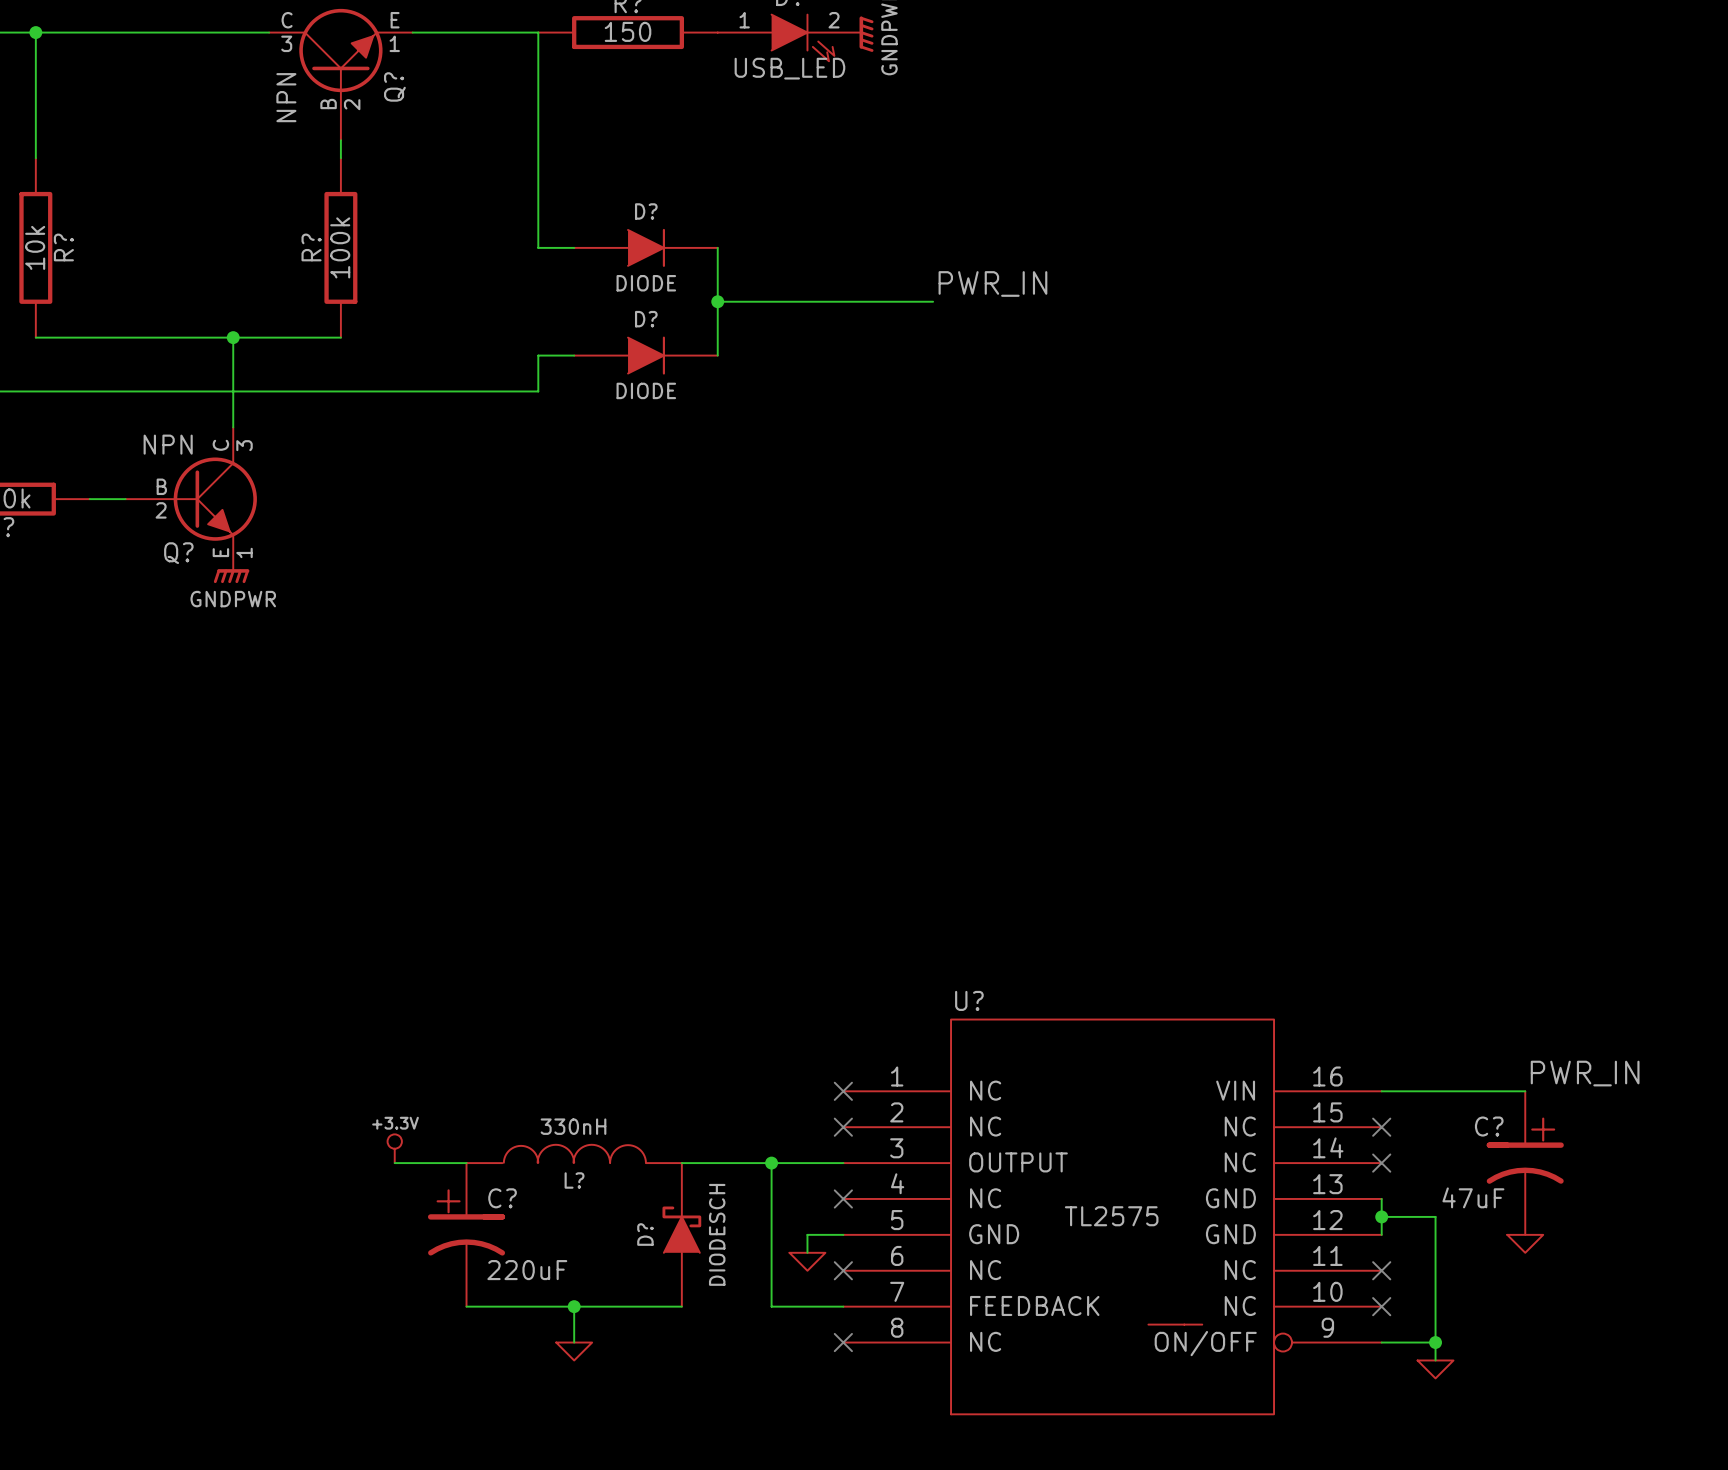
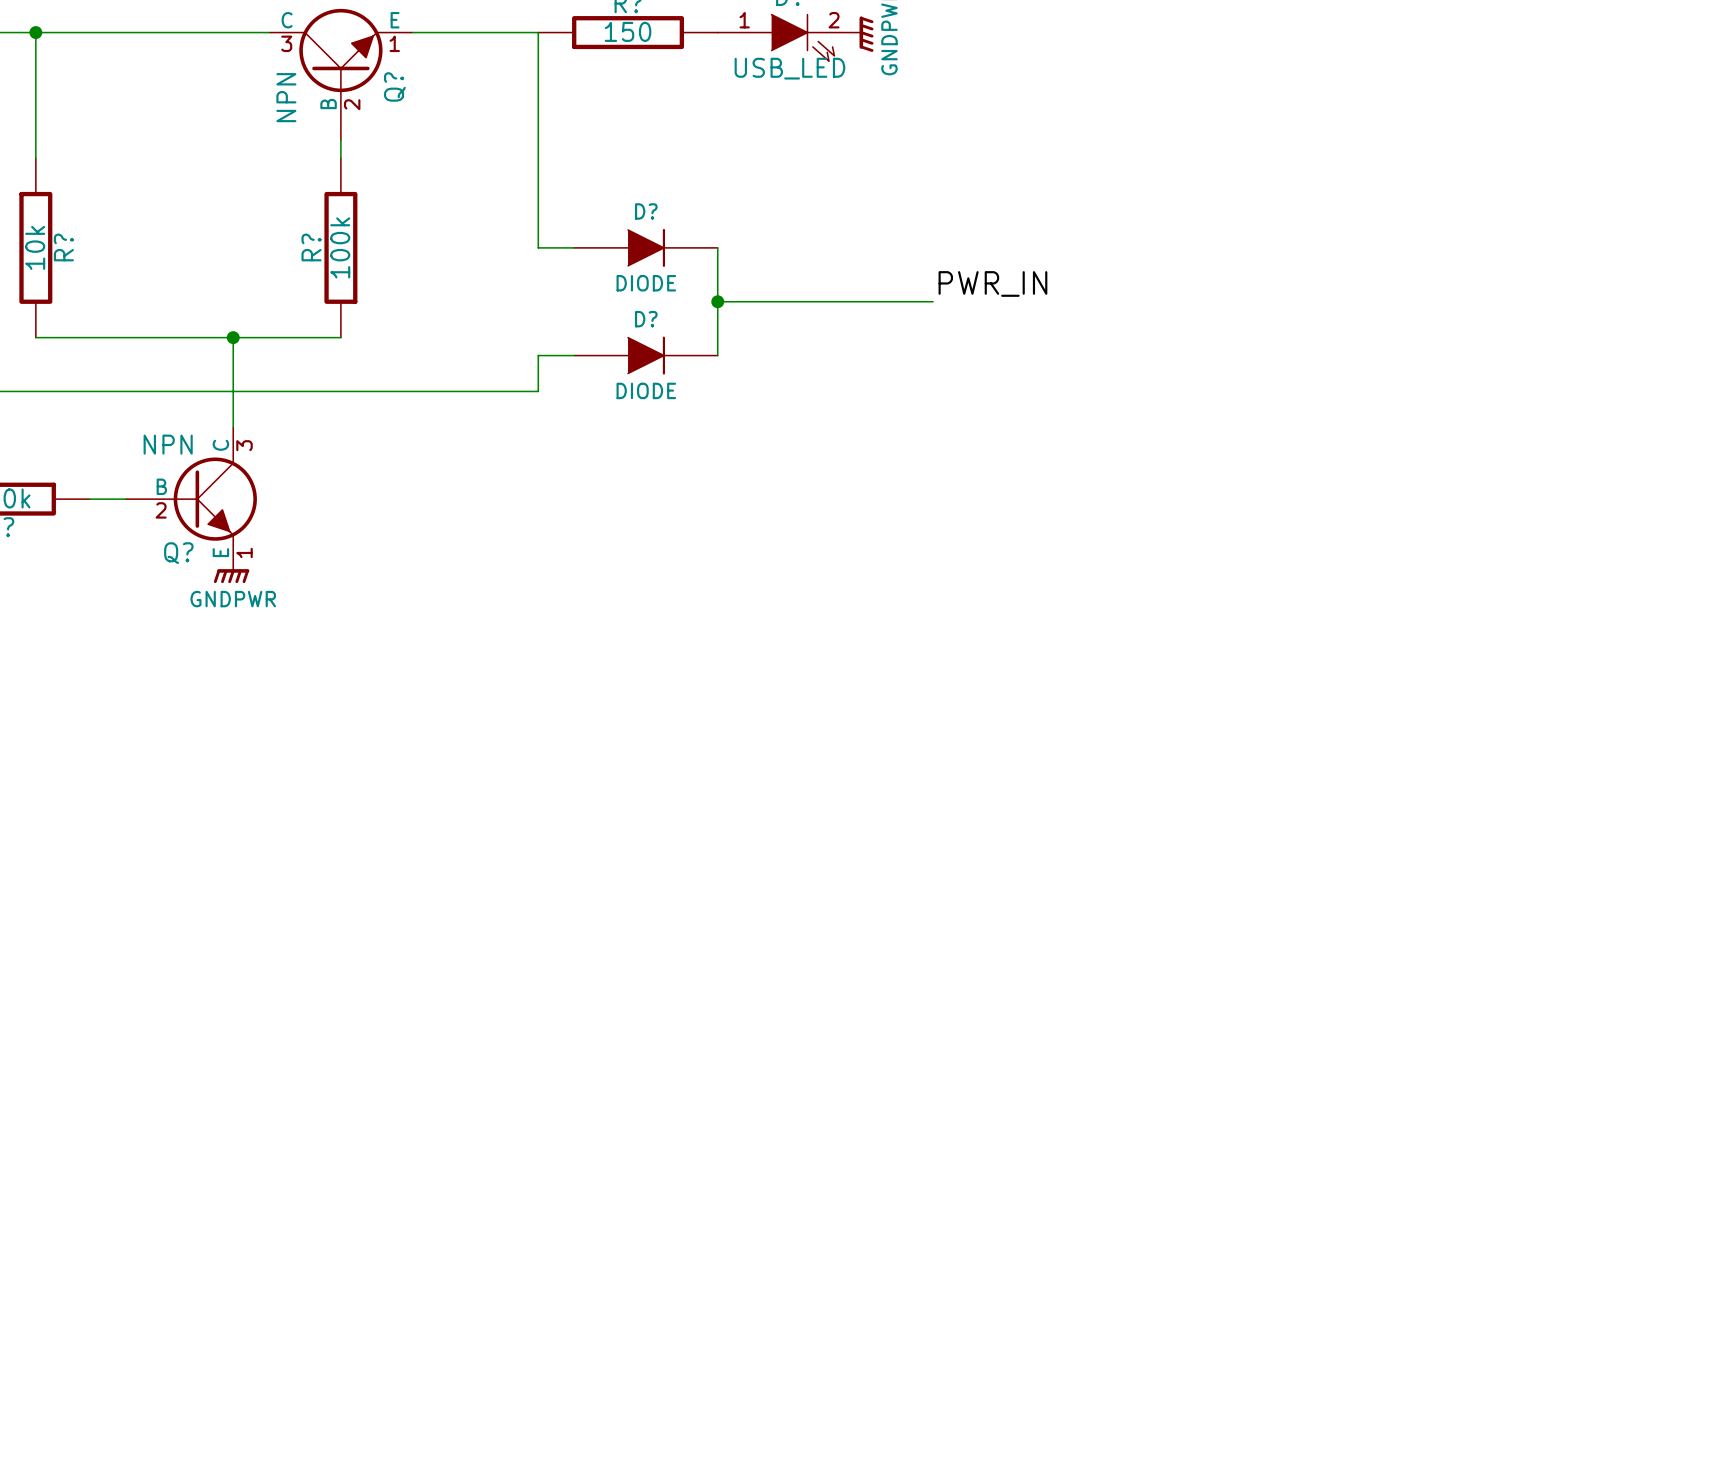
label: PWR_IN (1585, 1073) -> none
no-connect mark: (843, 1091) -> none
wire: (1381, 1091) (1525, 1091) -> none
no-connect mark: (843, 1127) -> none
no-connect mark: (1381, 1127) -> none
power symbol: +3.3V (394, 1148) -> none
L?: 330nH (574, 1153) -> none
wire: (394, 1163) (466, 1163) -> none
wire: (681, 1163) (843, 1163) -> none
wire: (771, 1163) (771, 1306) (843, 1306) -> none
junction: (771, 1163) -> none
no-connect mark: (1381, 1163) -> none
C?: 47uF (1525, 1163) -> none
no-connect mark: (843, 1198) -> none
wire: (1381, 1198) (1381, 1234) -> none
U?: TL2575 (1112, 1216) -> none
wire: (1381, 1216) (1435, 1216) (1435, 1360) -> none
junction: (1381, 1216) -> none
C?: 220uF (466, 1234) -> none
D?: DIODESCH (681, 1234) -> none
wire: (843, 1234) (807, 1234) (807, 1252) -> none
power symbol: (1525, 1243) -> none
power symbol: (807, 1261) -> none
no-connect mark: (843, 1270) -> none
no-connect mark: (1381, 1270) -> none
wire: (466, 1306) (681, 1306) -> none
wire: (574, 1306) (574, 1342) -> none
junction: (574, 1306) -> none
no-connect mark: (1381, 1306) -> none
no-connect mark: (843, 1342) -> none
wire: (1381, 1342) (1435, 1342) -> none
junction: (1435, 1342) -> none
power symbol: (574, 1351) -> none
power symbol: (1435, 1369) -> none

